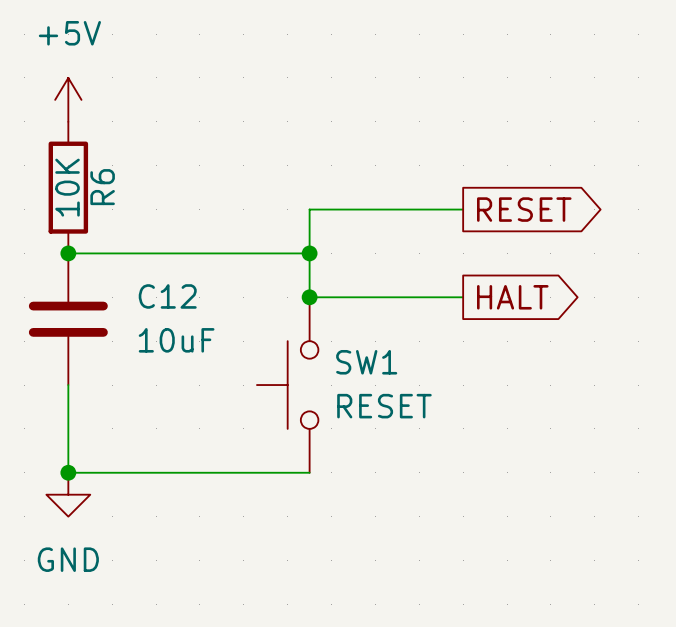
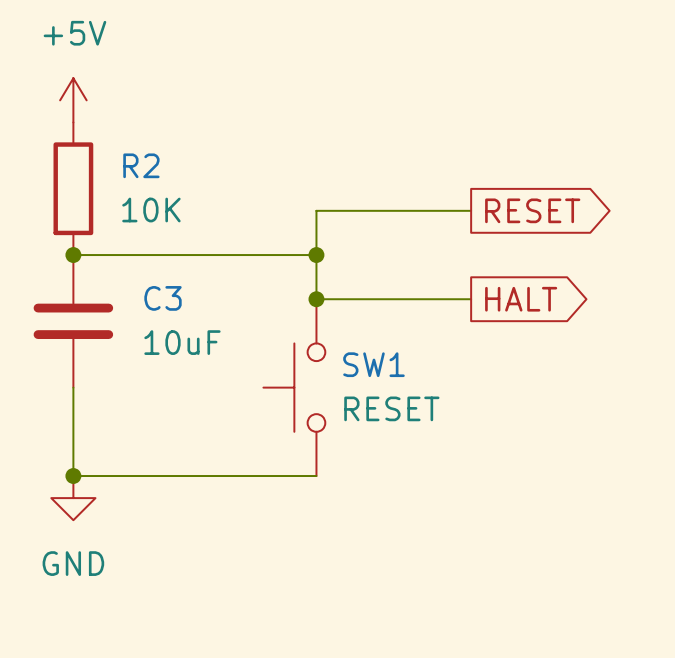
R6 value rotation: 0° (67, 187) -> 90° clockwise (151, 210)
R6 value position: 10K (67, 187) -> 10K (151, 210)
R6 name: R6 (102, 187) -> R2 (141, 165)
C12 name: C12 (167, 296) -> C3 (162, 298)

